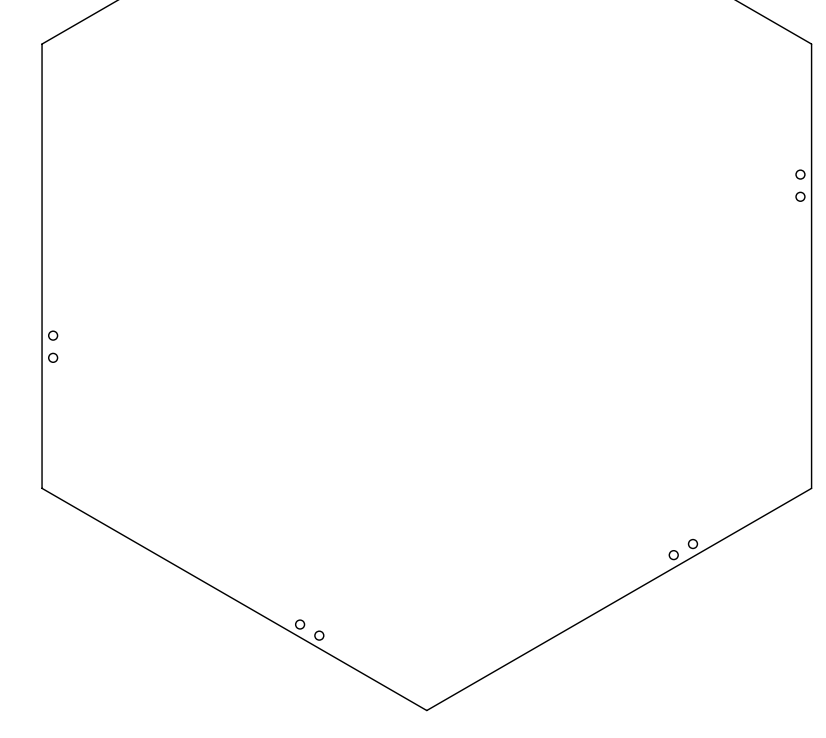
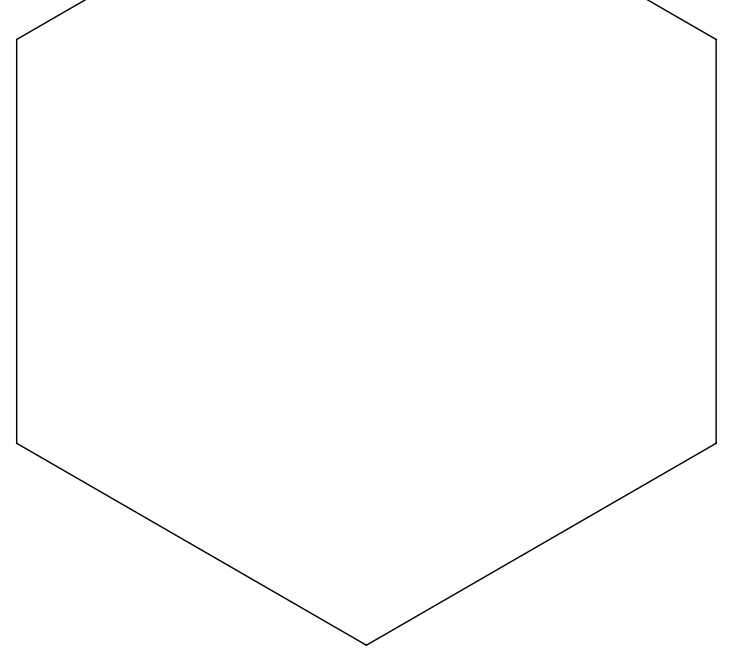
round board edge: [795, 169, 806, 180] -> none
round board edge: [795, 192, 806, 202] -> none
round board edge: [48, 330, 58, 341] -> none
round board edge: [48, 353, 58, 363] -> none
round board edge: [688, 539, 698, 549] -> none
round board edge: [669, 550, 679, 560] -> none
round board edge: [295, 619, 305, 630] -> none
round board edge: [314, 630, 325, 641] -> none

